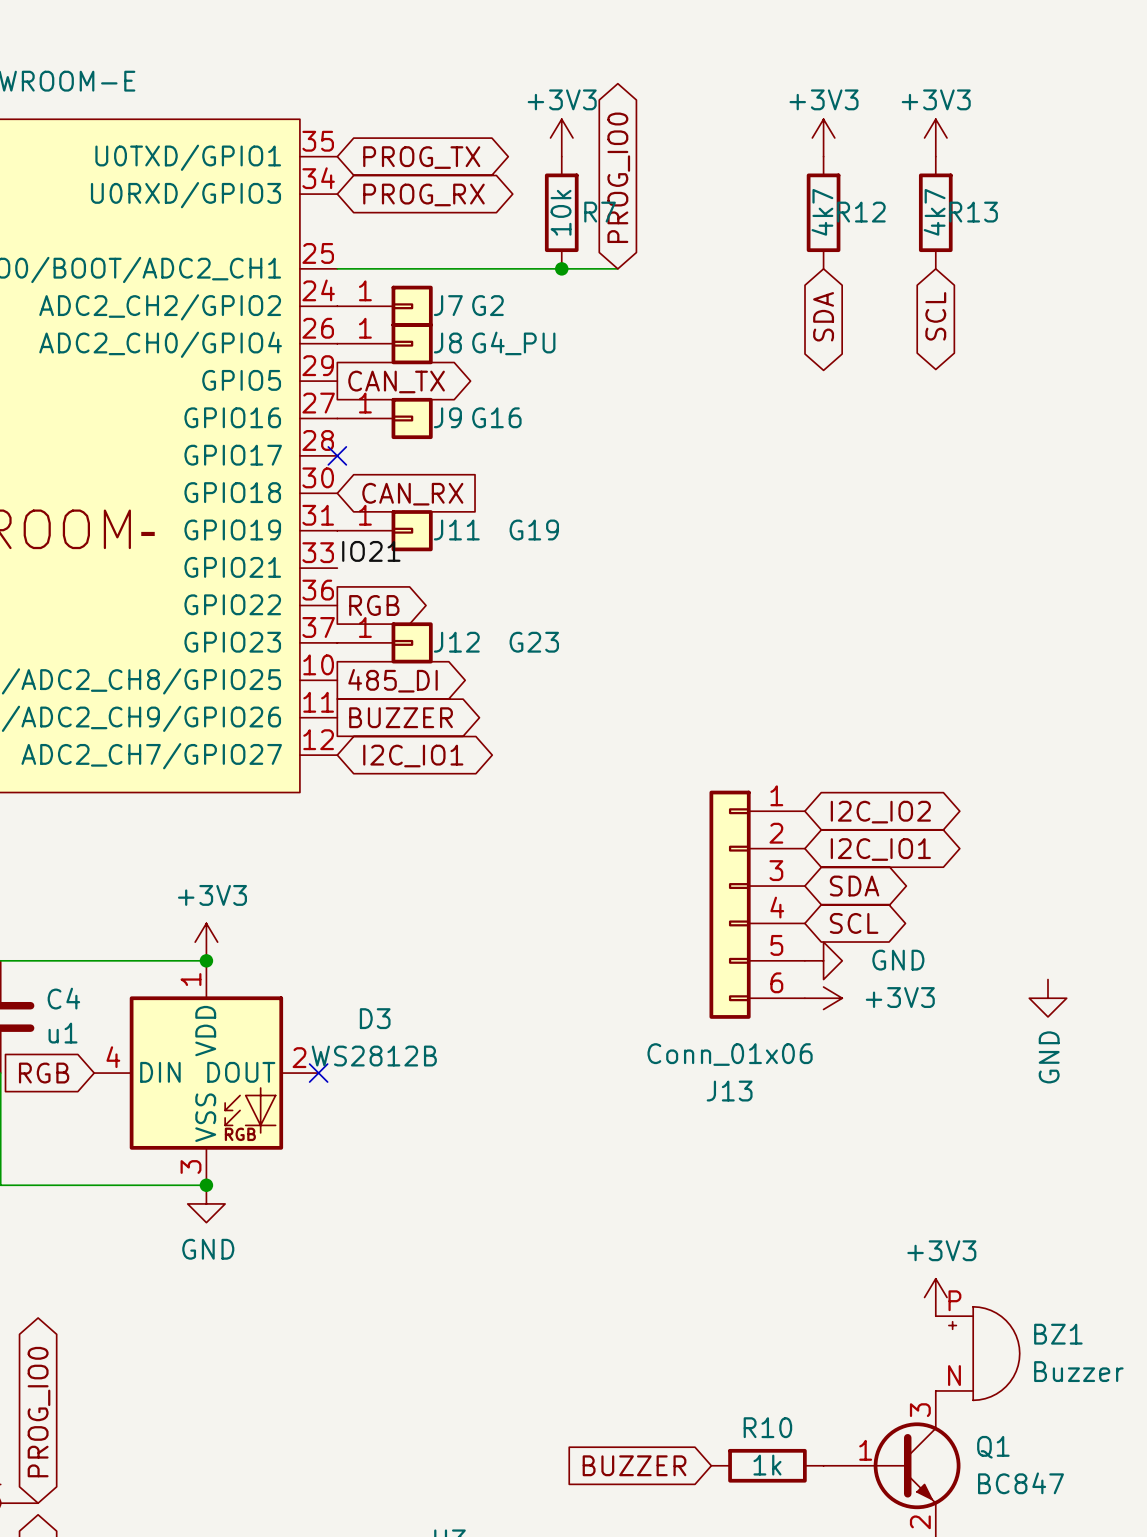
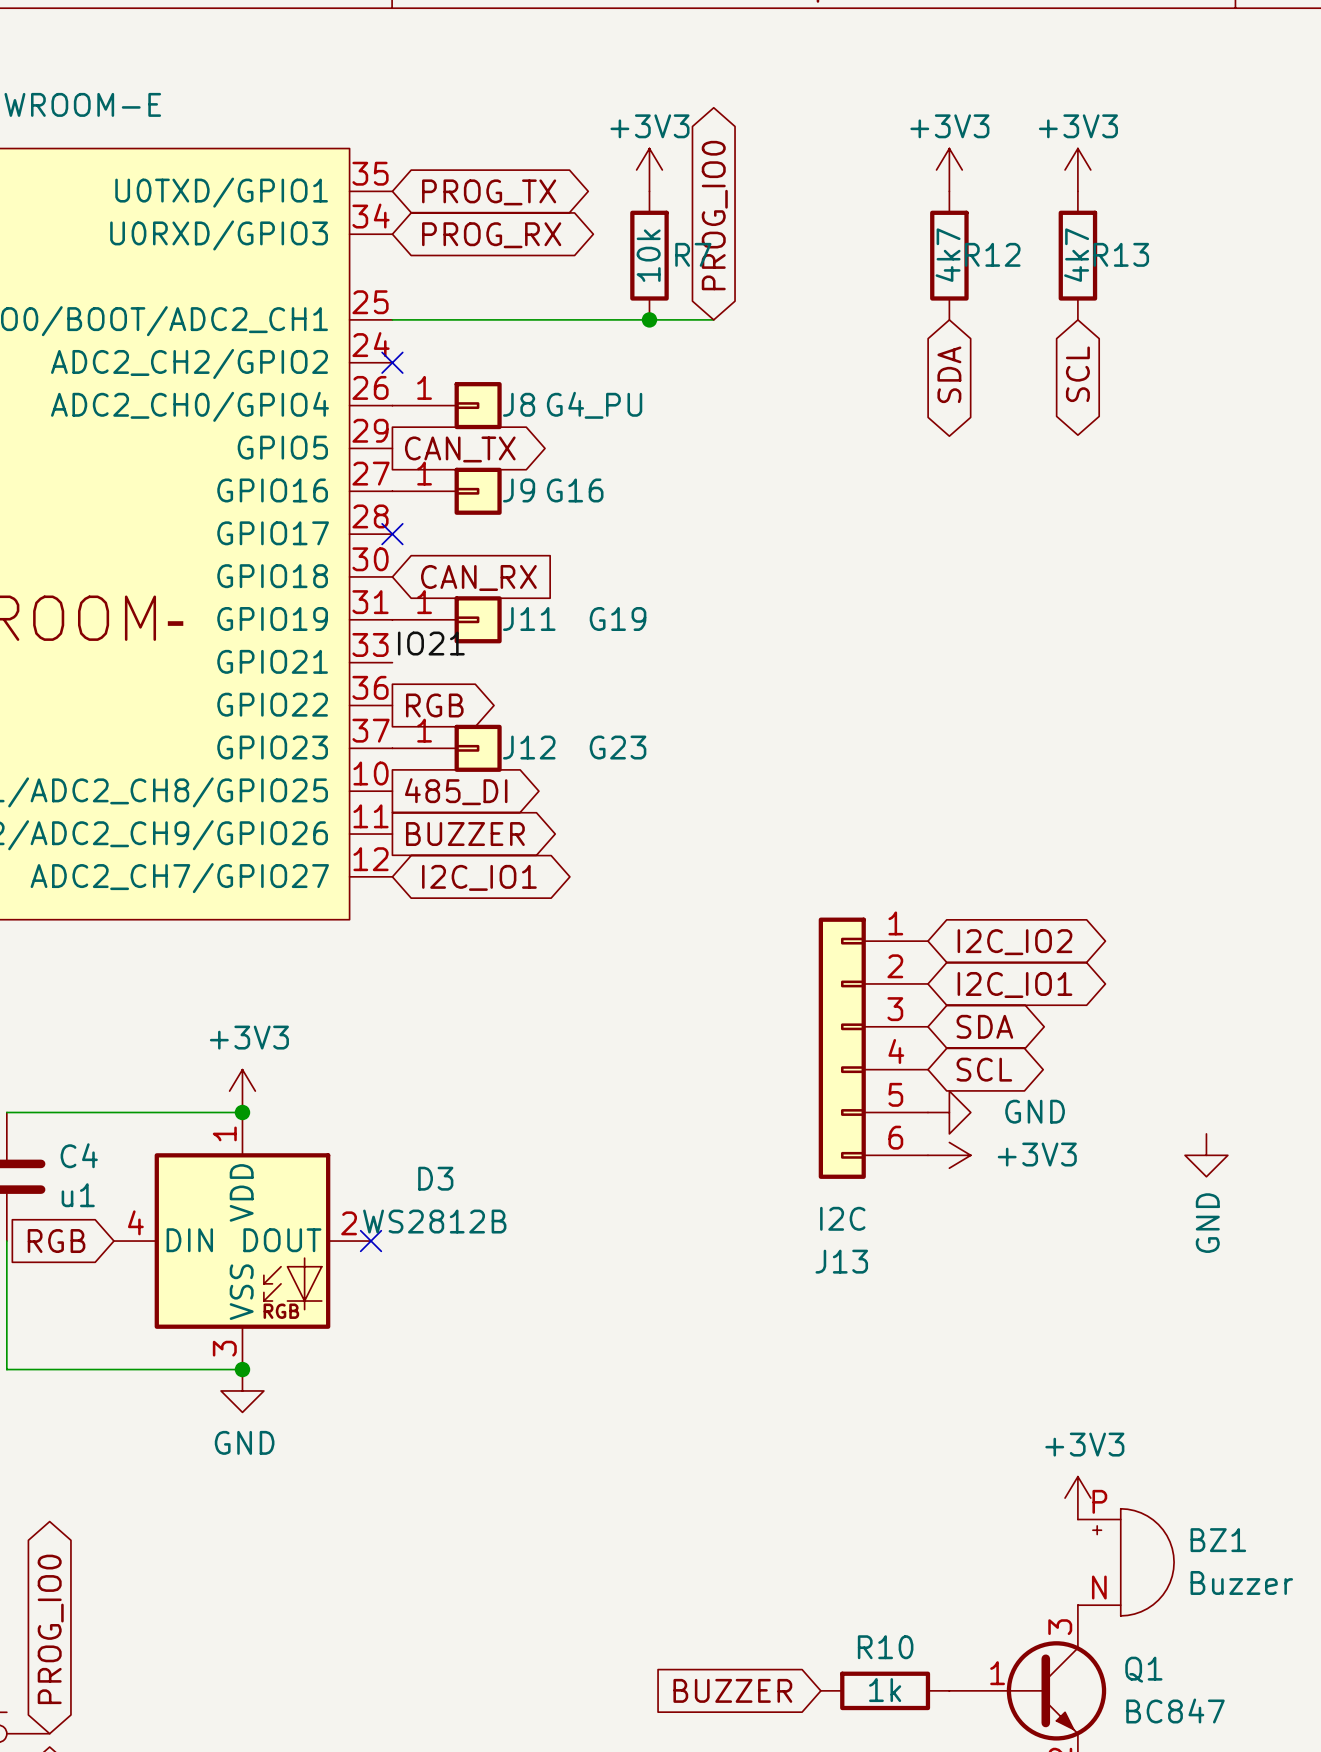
no-connect mark: none -> (392, 362)
J7: G2 (385, 306) -> none
J13 value: Conn_01x06 (730, 1054) -> I2C (842, 1218)

